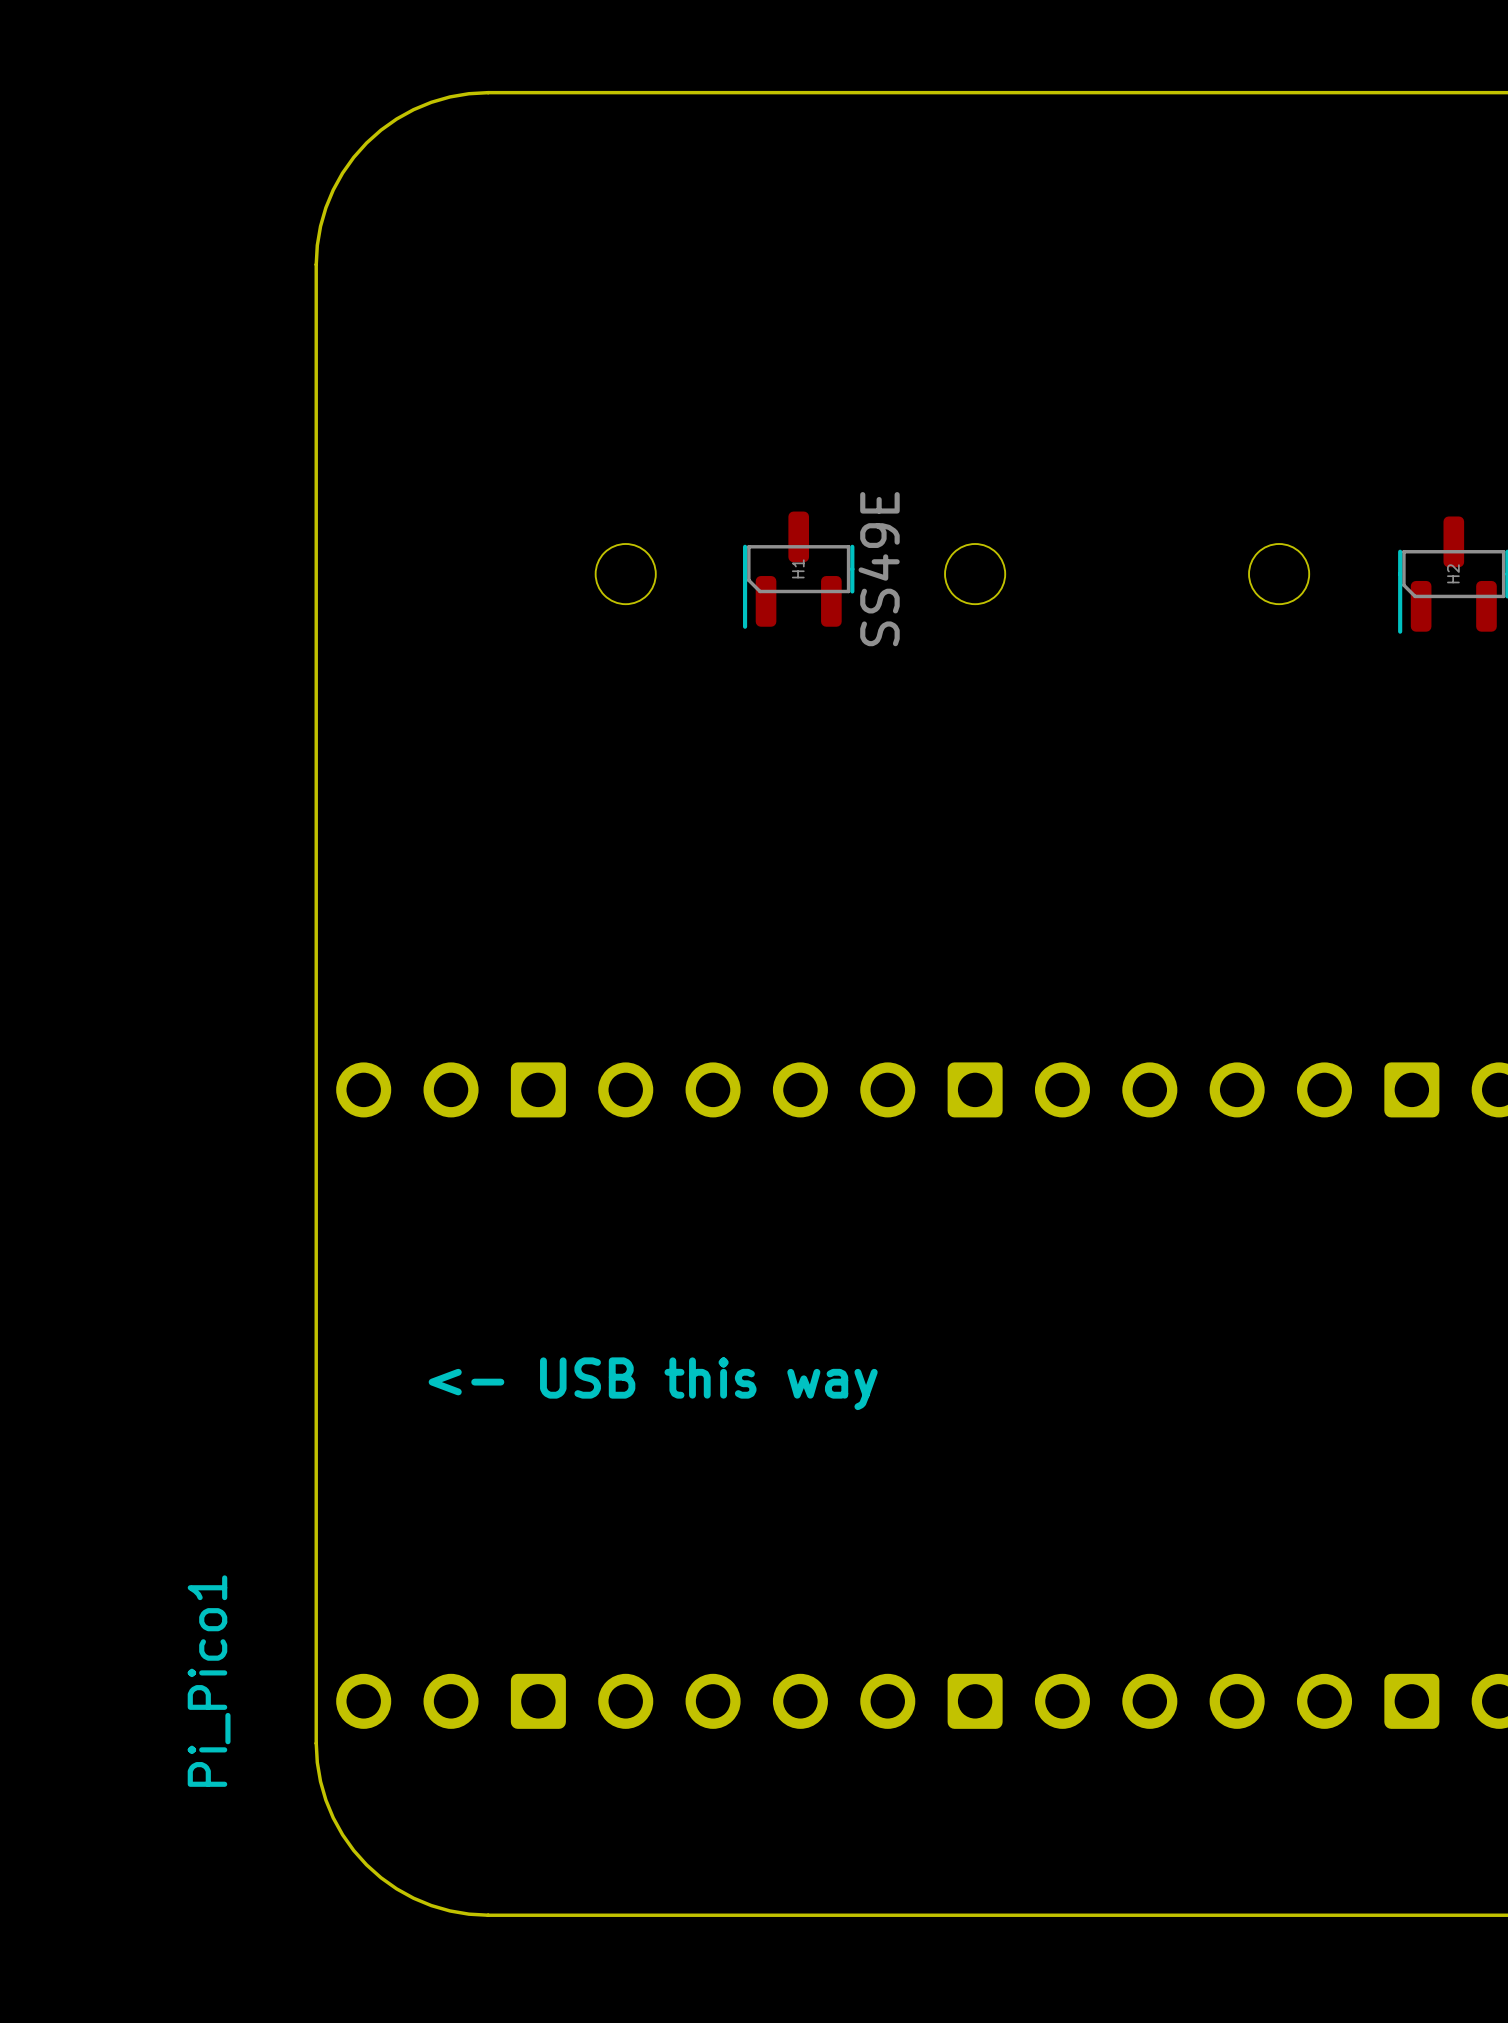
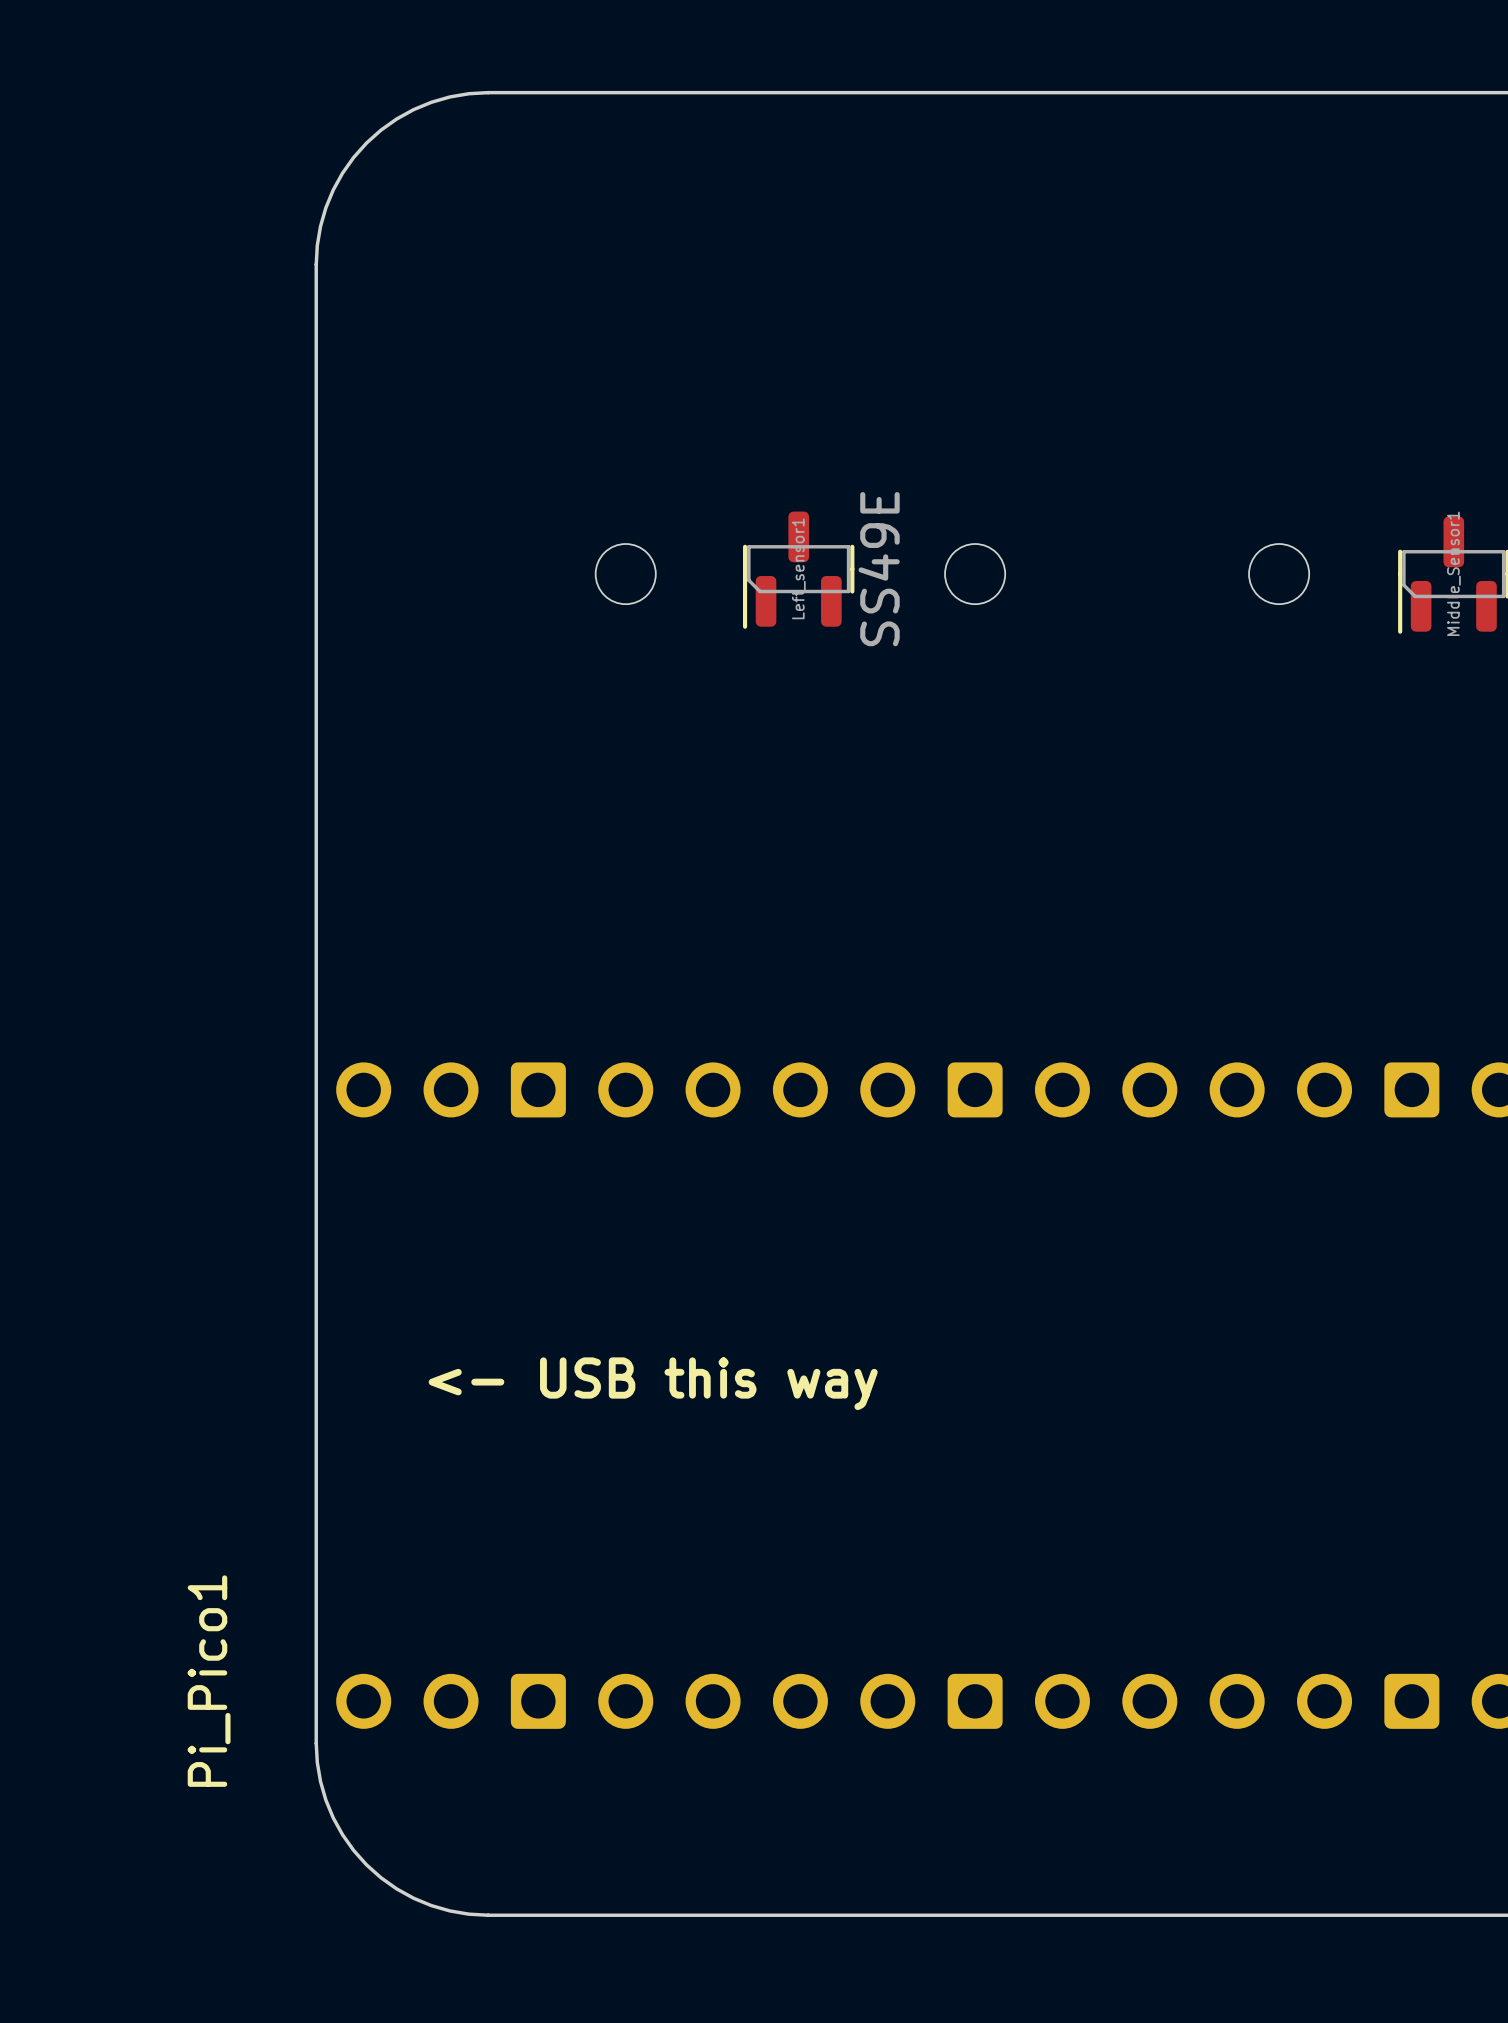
H1 name: H1 (798, 568) -> Left_sensor1 (798, 568)
H2 name: H2 (1453, 573) -> Middle_Sensor1 (1453, 573)

